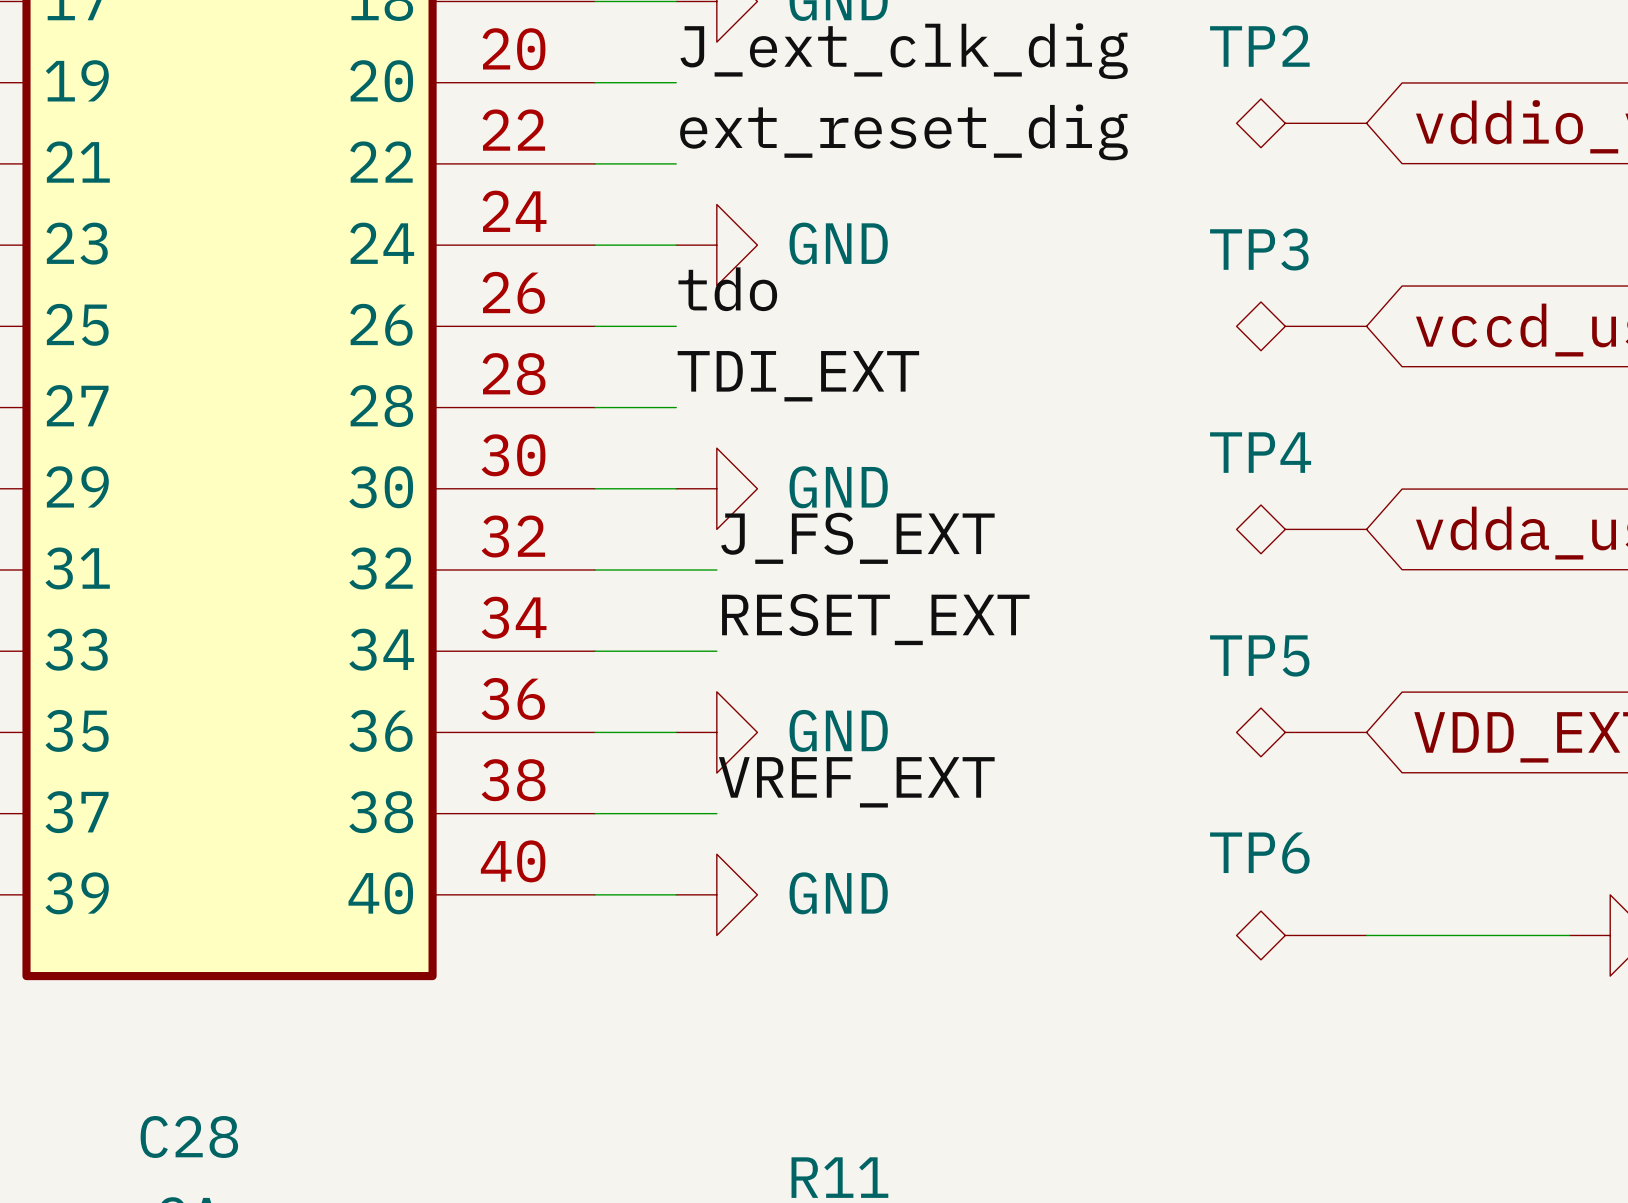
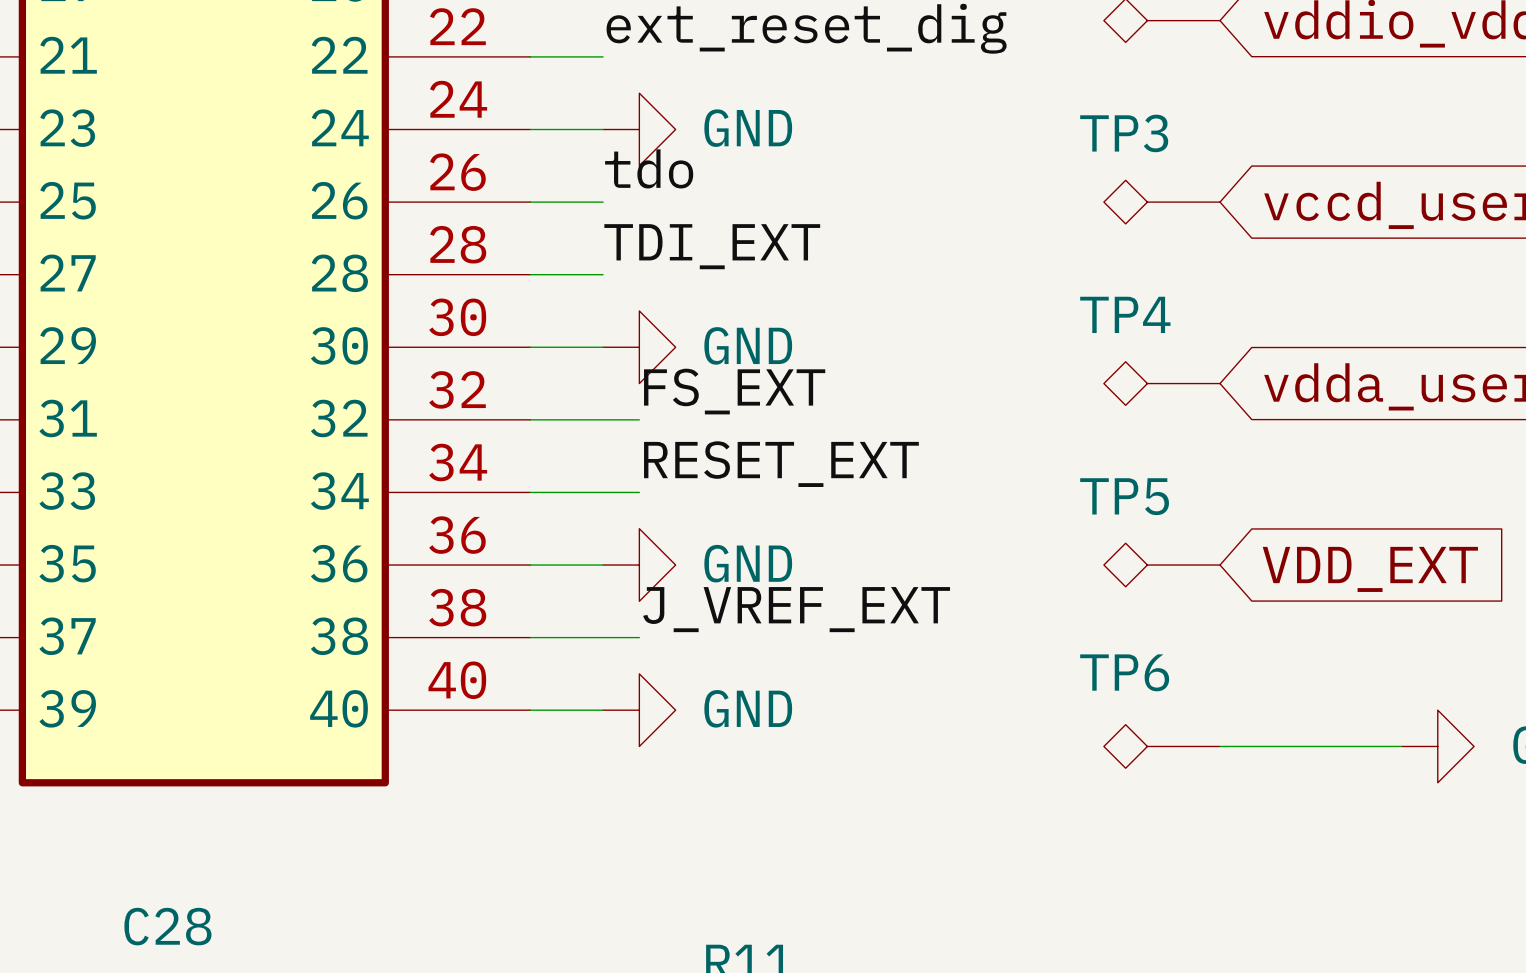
label: J_FS_EXT (857, 538) -> FS_EXT (734, 391)
label: VREF_EXT (856, 782) -> J_VREF_EXT (796, 609)

